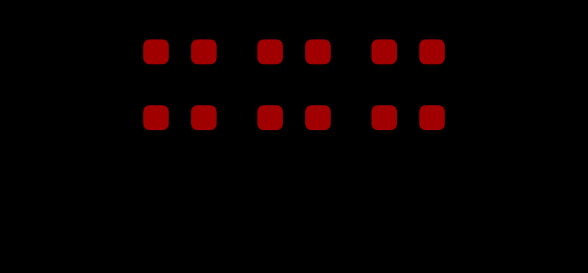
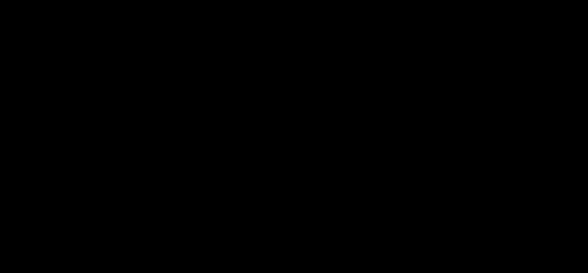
part: (179, 51) -> none
part: (294, 51) -> none
part: (408, 51) -> none
part: (179, 117) -> none
part: (294, 117) -> none
part: (408, 117) -> none

